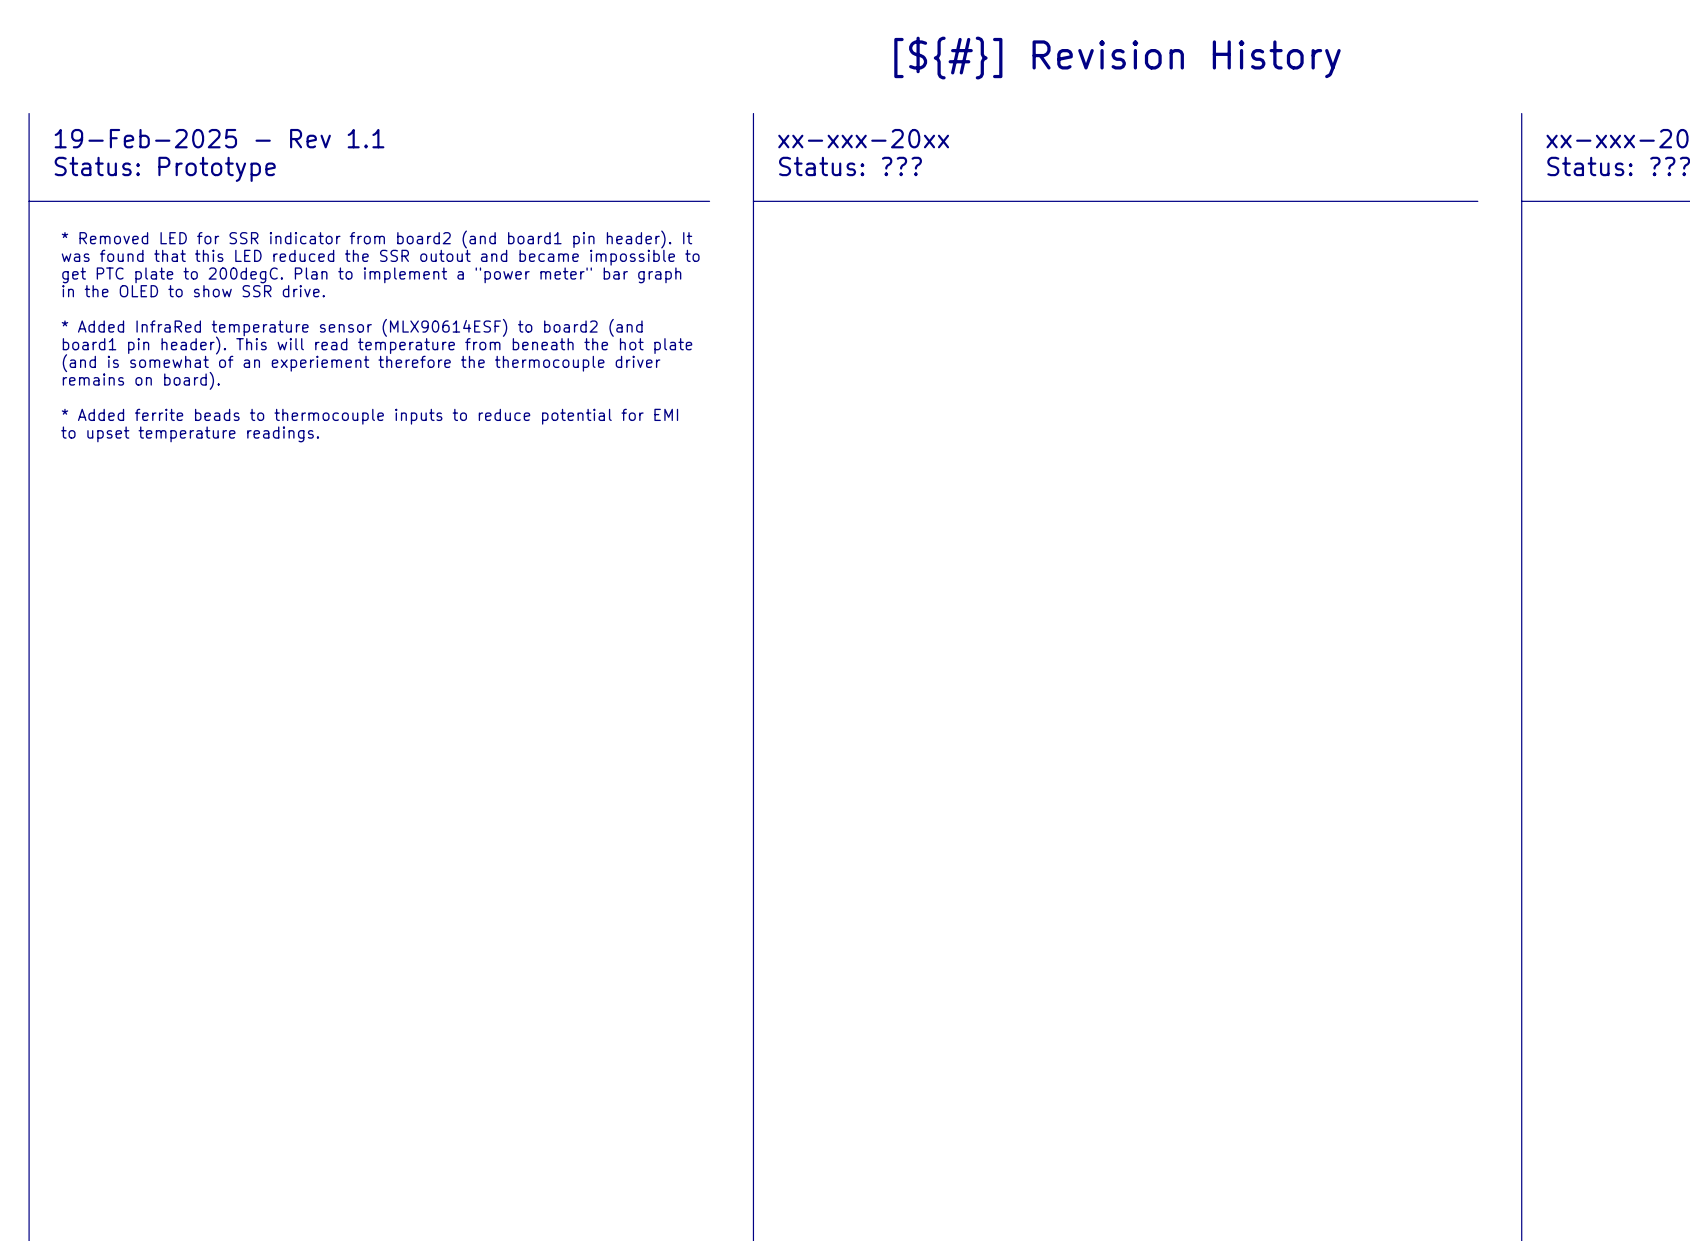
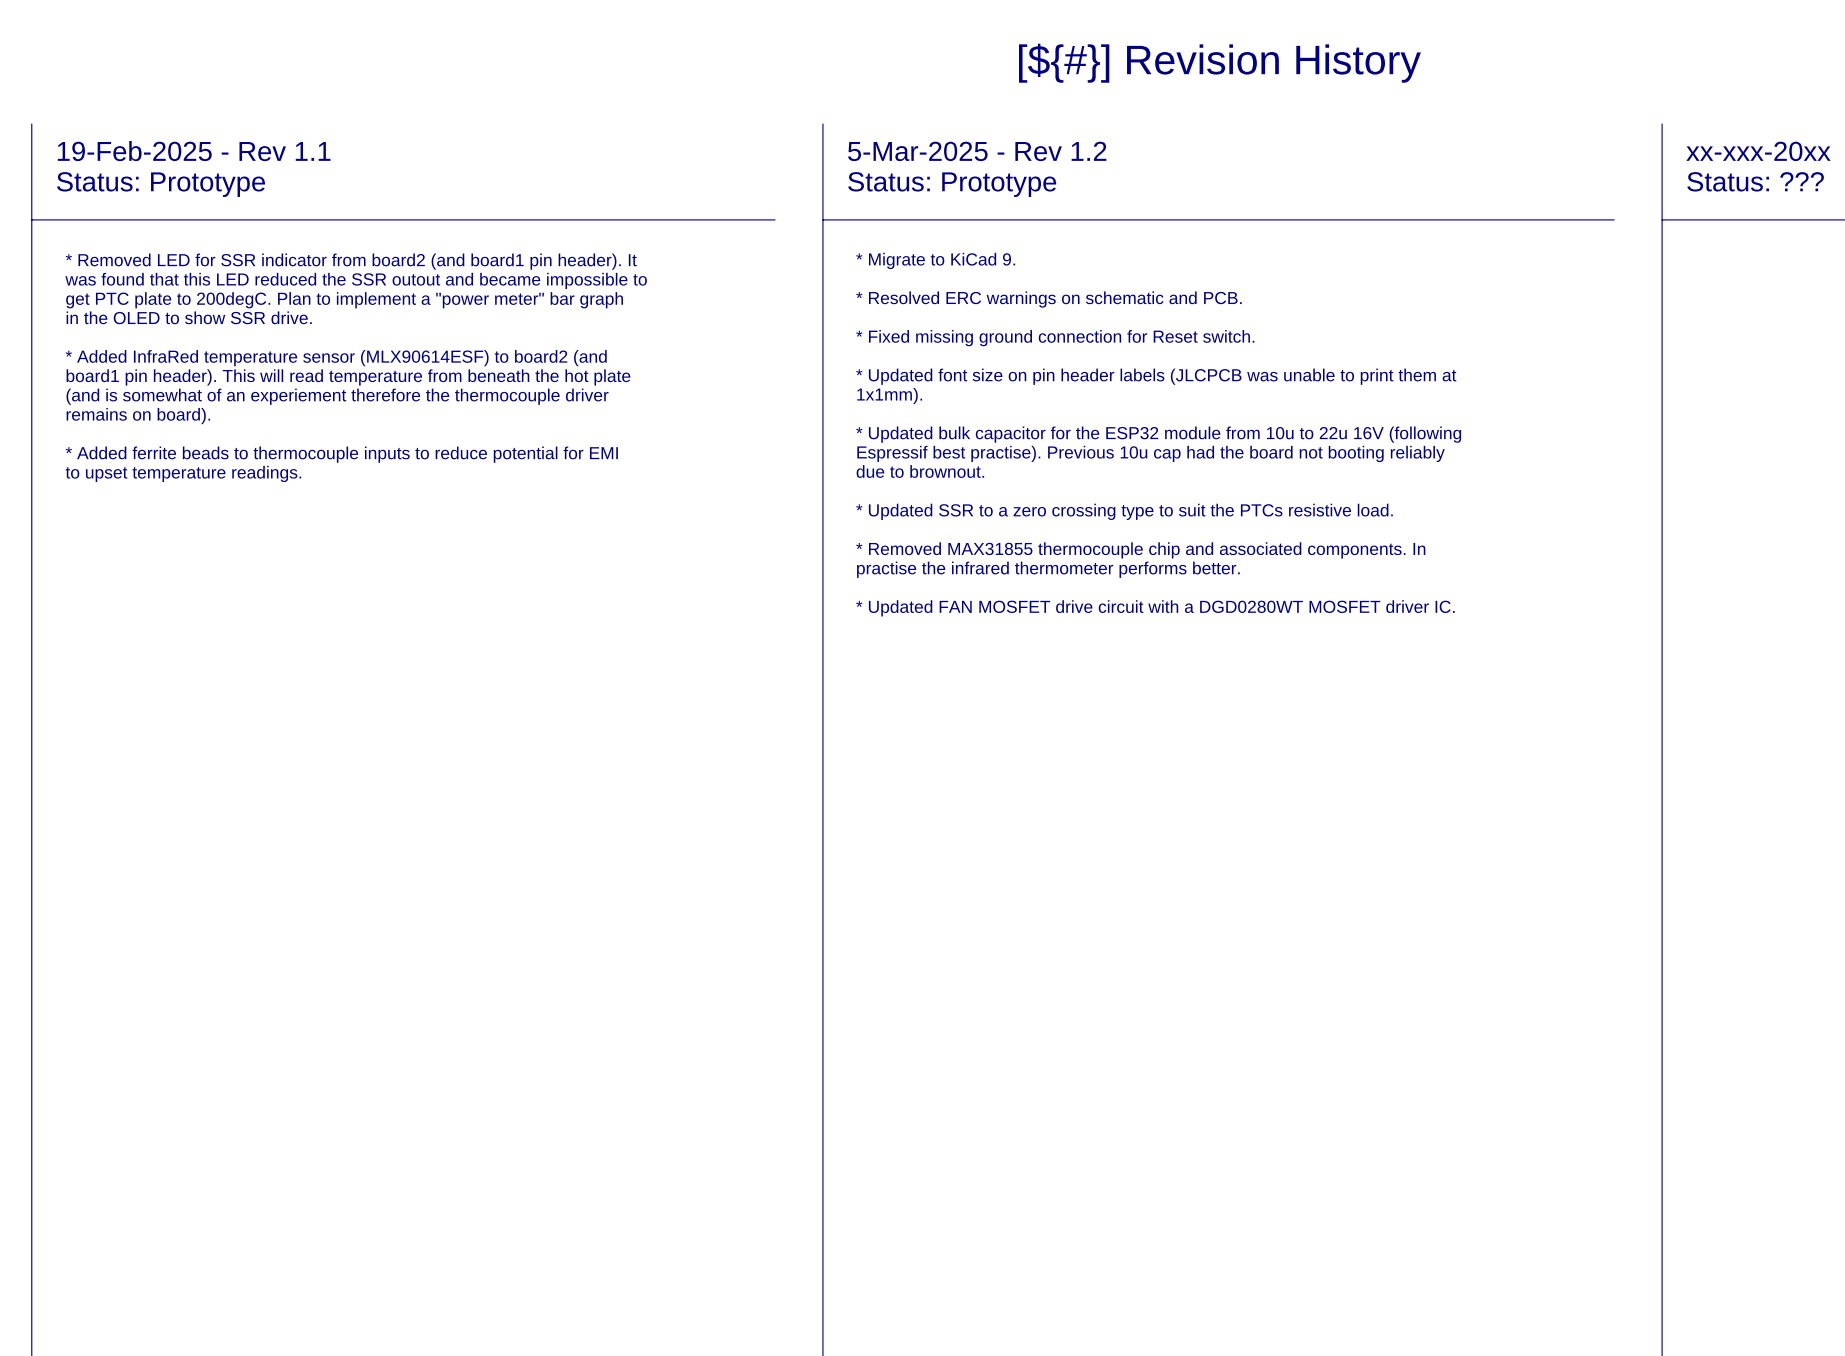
text: xx-xxx-20xx (863, 138) -> 5-Mar-2025 - Rev 1.2 (977, 151)
text: Status: ??? (850, 166) -> Status: Prototype (952, 184)
text: none -> * Migrate to KiCad 9. (935, 260)
text: none -> * Resolved ERC warnings on schematic and PCB. (1048, 299)
text: none -> * Fixed missing ground connection for Reset switch. (1055, 338)
text: none -> * Updated font size on pin header labels (JLCPCB was unable to print them at (1156, 376)
text: none -> 1x1mm). (889, 396)
text: none -> * Updated bulk capacitor for the ESP32 module from 10u to 22u 16V (following (1158, 434)
text: none -> Espressif best practise). Previous 10u cap had the board not booting reliably (1151, 453)
text: none -> due to brownout. (920, 471)
text: none -> * Updated SSR to a zero crossing type to suit the PTCs resistive load. (1124, 511)
text: none -> * Removed MAX31855 thermocouple chip and associated components. In (1140, 550)
text: none -> practise the infrared thermometer performs better. (1048, 569)
text: none -> * Updated FAN MOSFET drive circuit with a DGD0280WT MOSFET driver IC. (1155, 608)

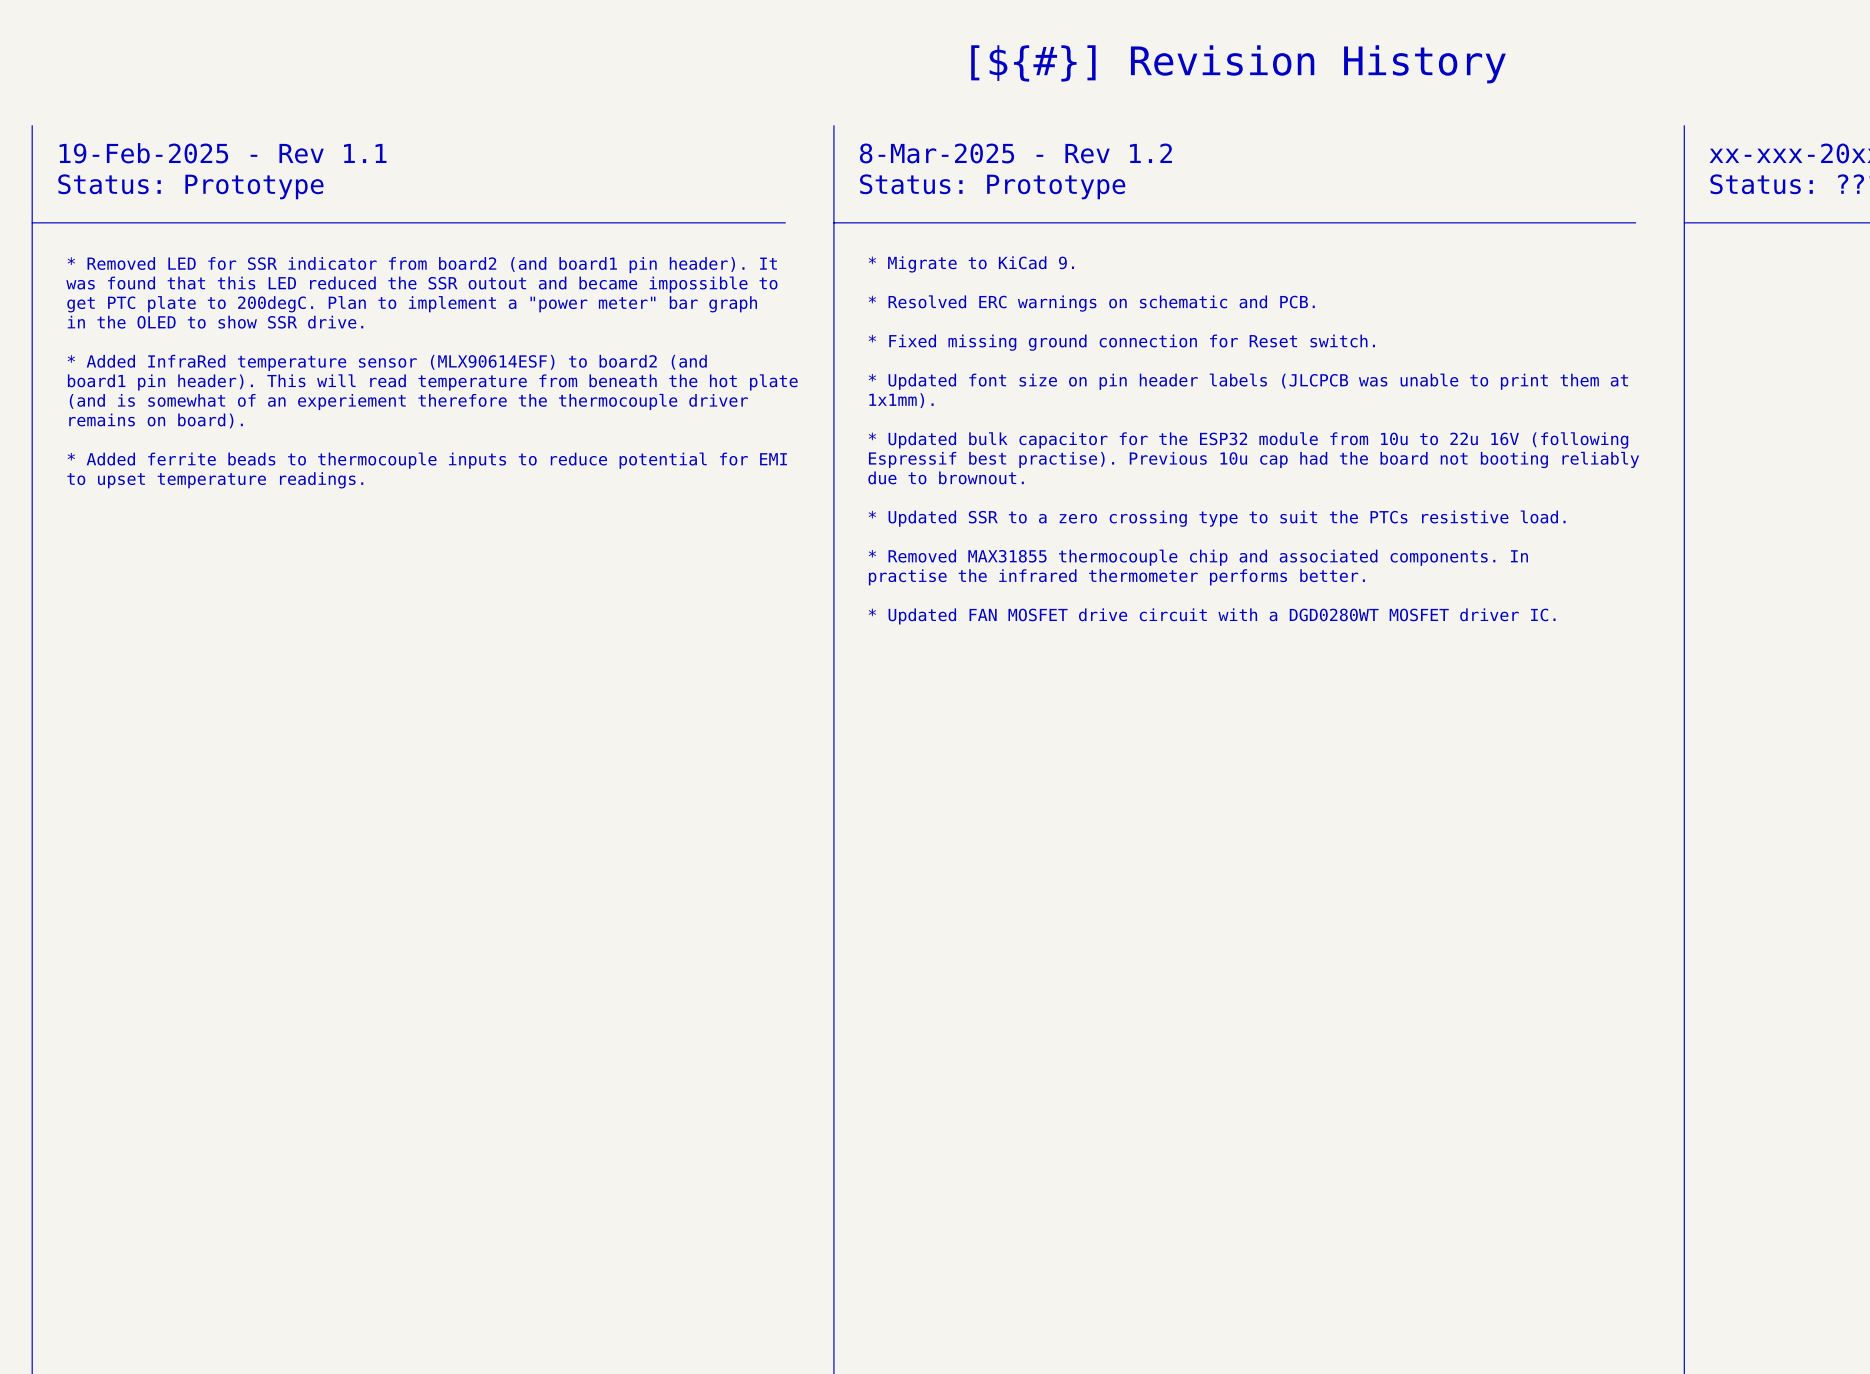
text: 5-Mar-2025 - Rev 1.2 (977, 151) -> 8-Mar-2025 - Rev 1.2 (1015, 153)

